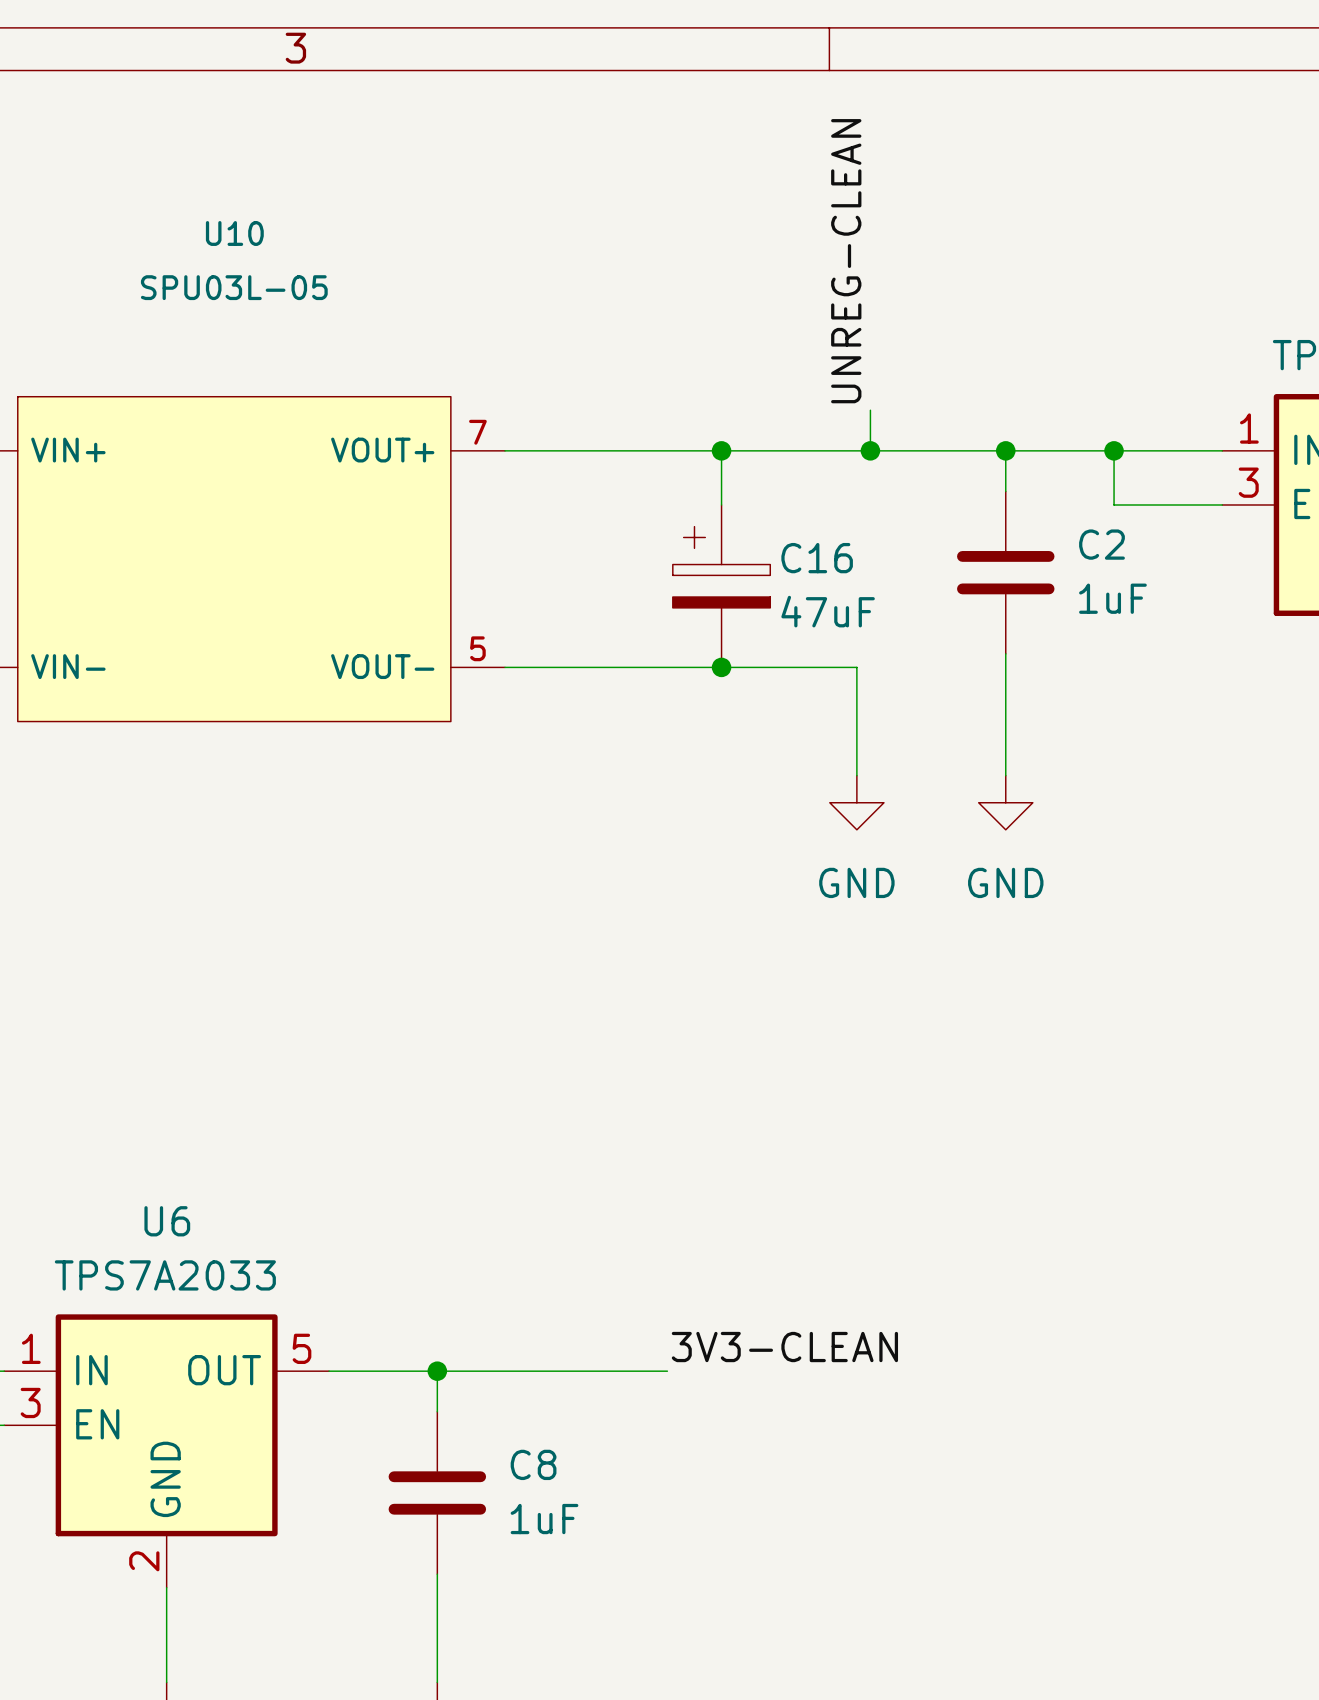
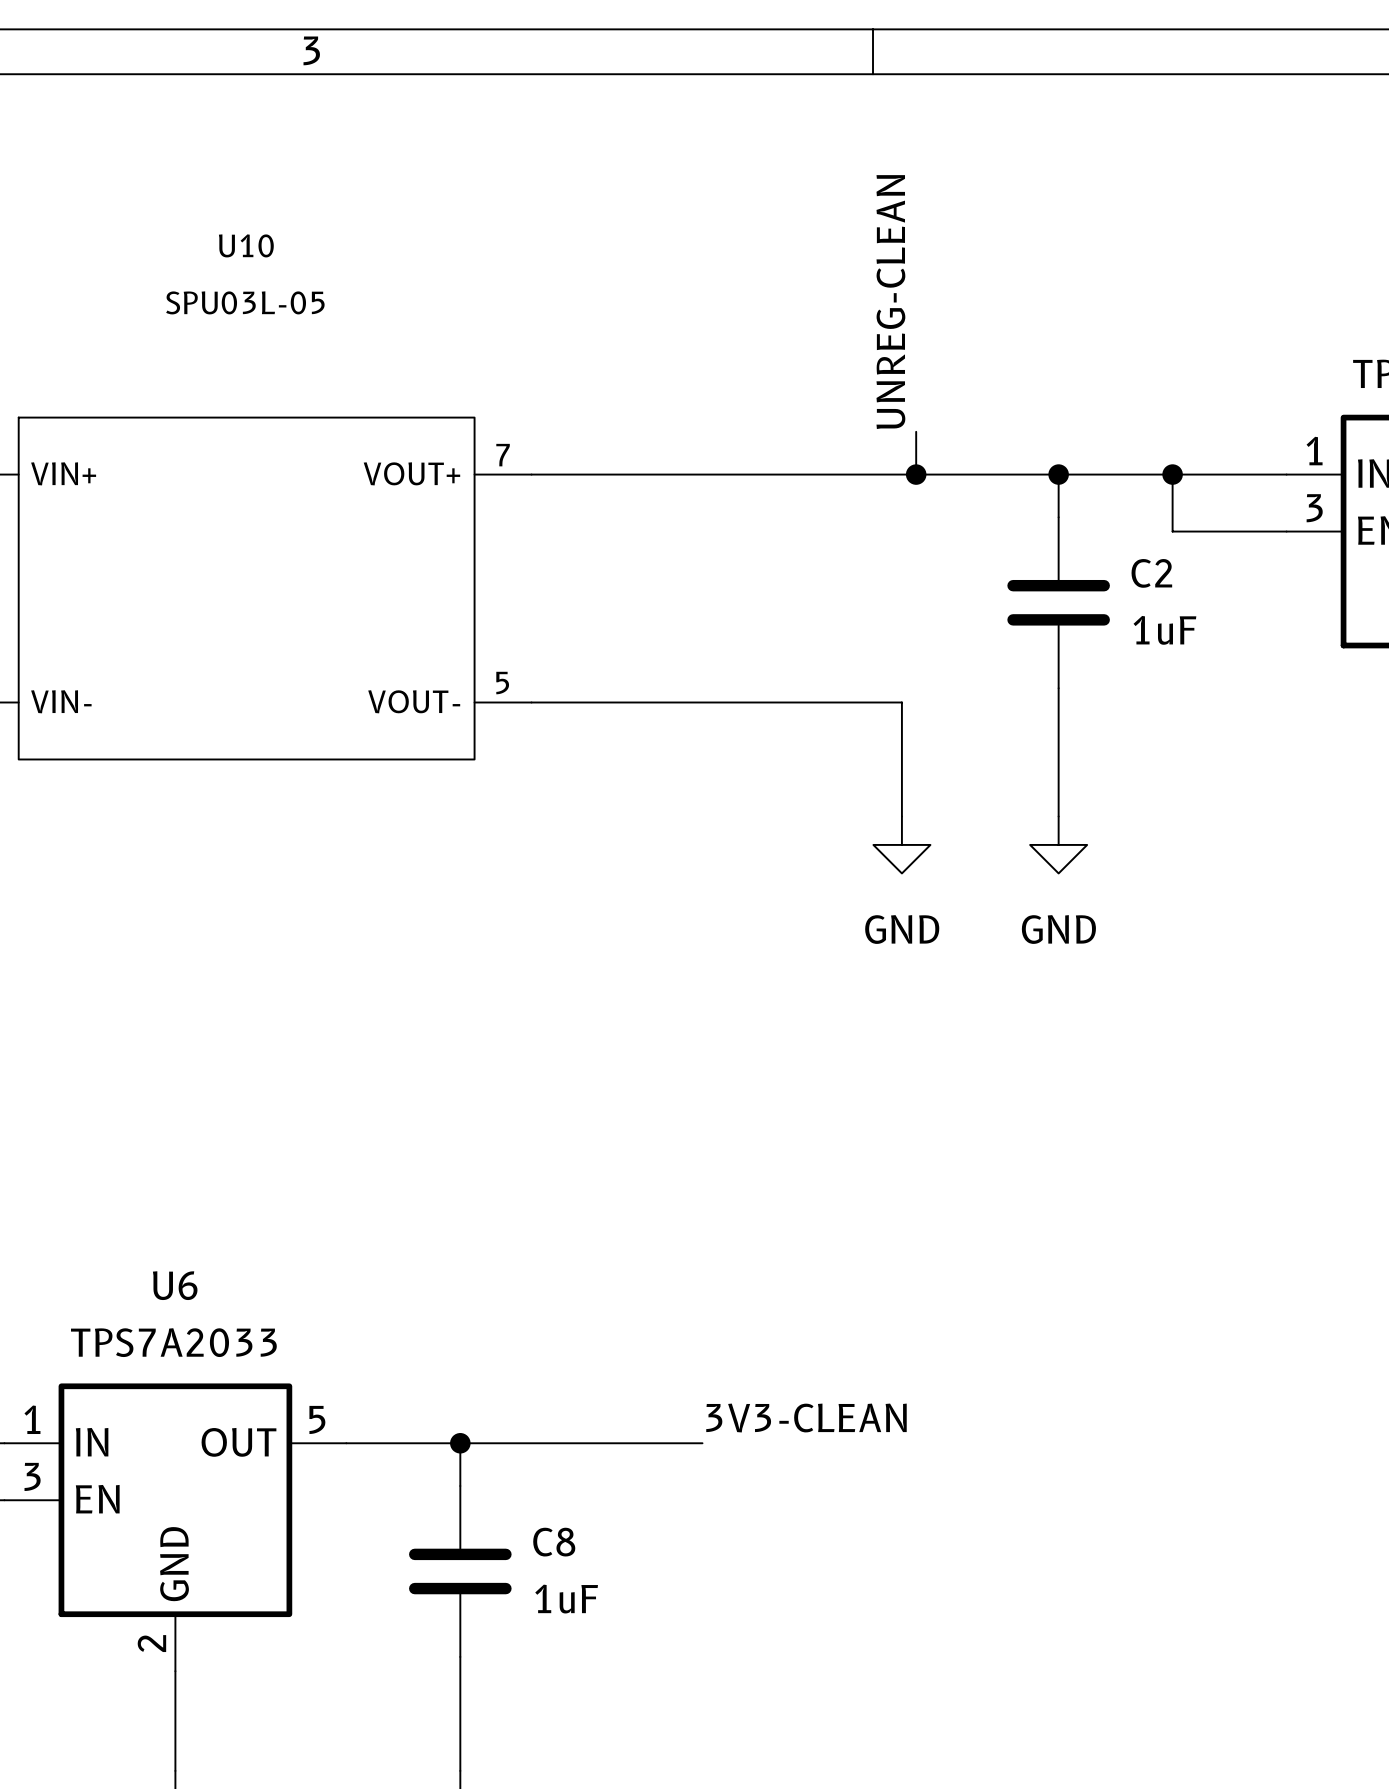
wire: (721, 450) (721, 504) -> none
junction: (721, 450) -> none
C16: 47uF (721, 586) -> none
junction: (721, 667) -> none

